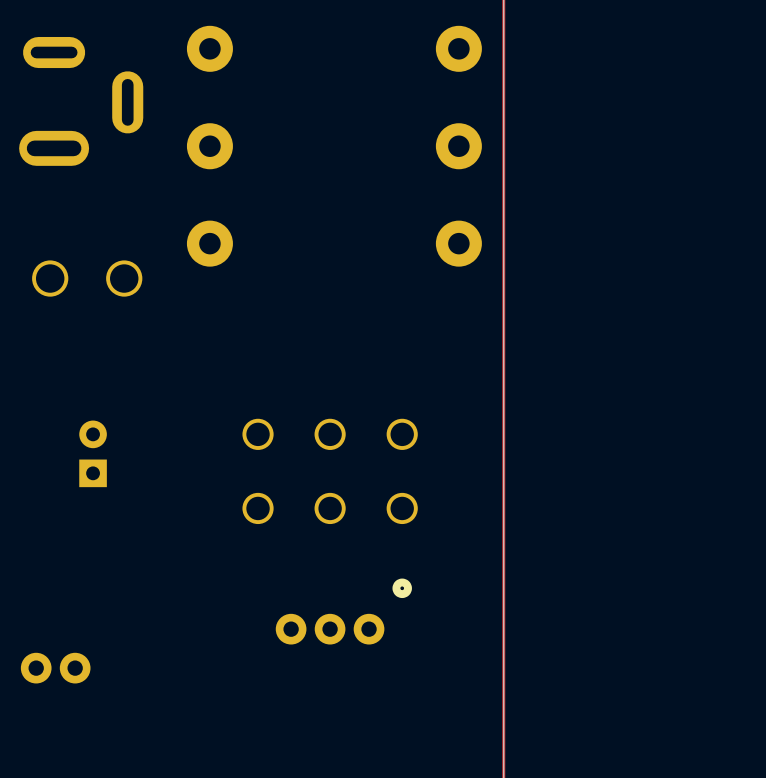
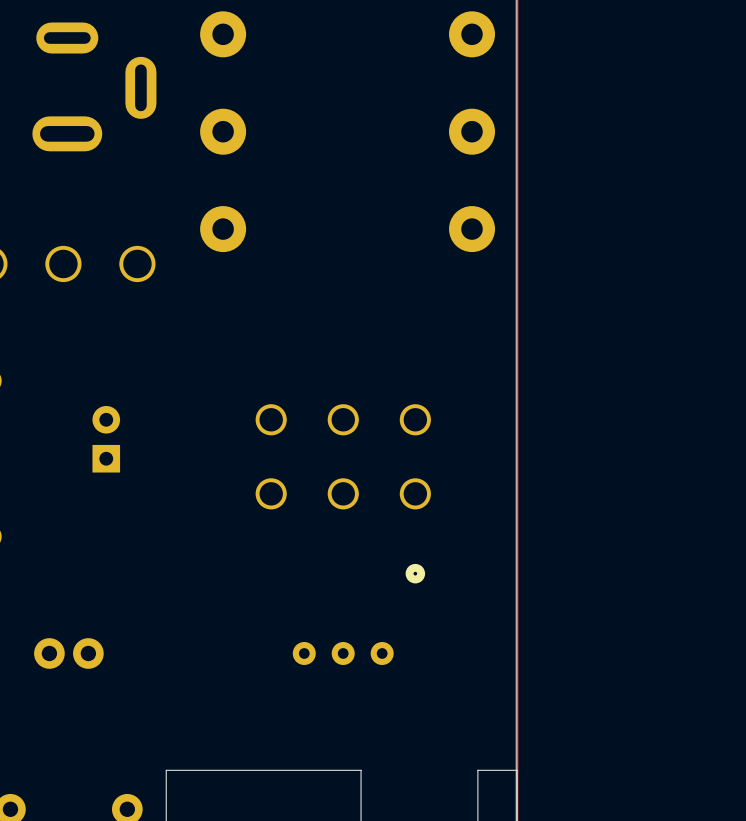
part: (291, 629) -> none
part: (330, 629) -> none
part: (369, 629) -> none
part: none -> (304, 653)
part: none -> (343, 653)
part: none -> (382, 653)

